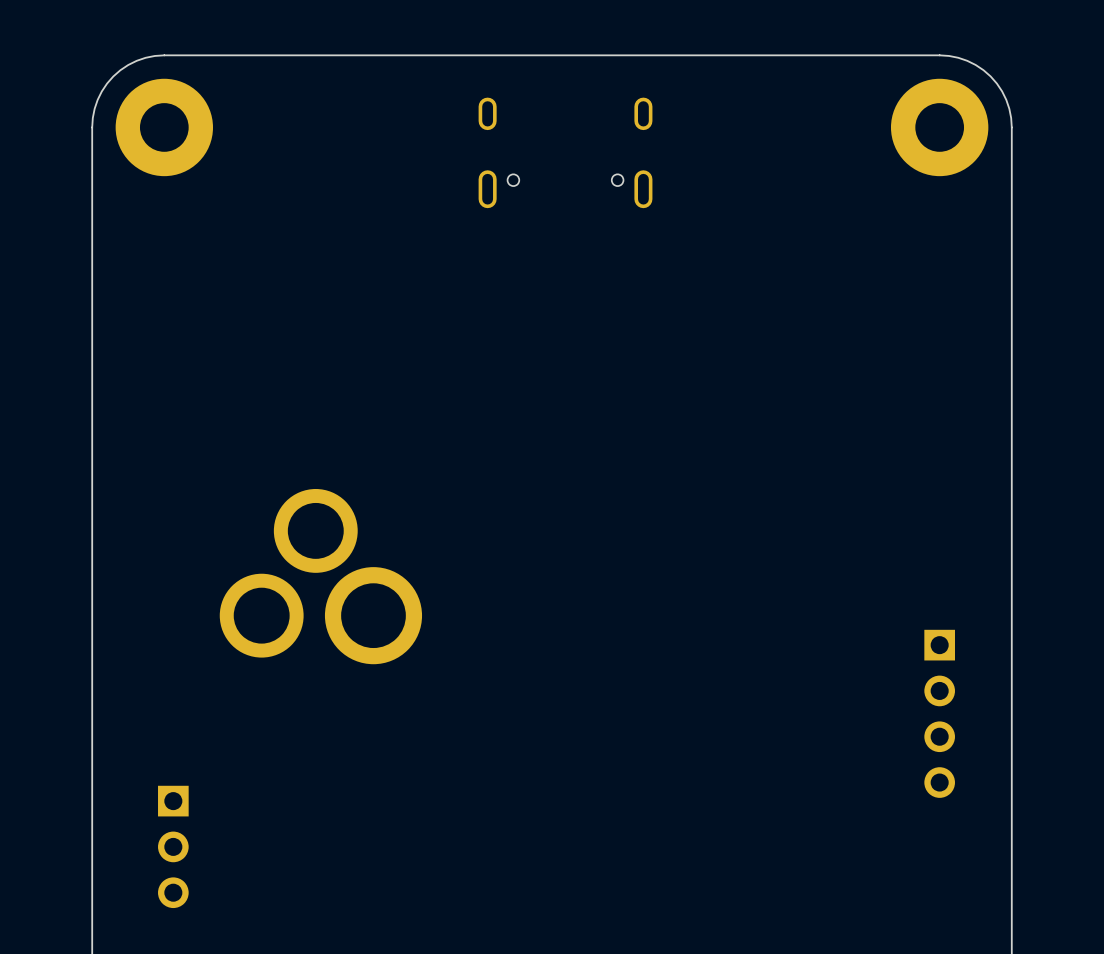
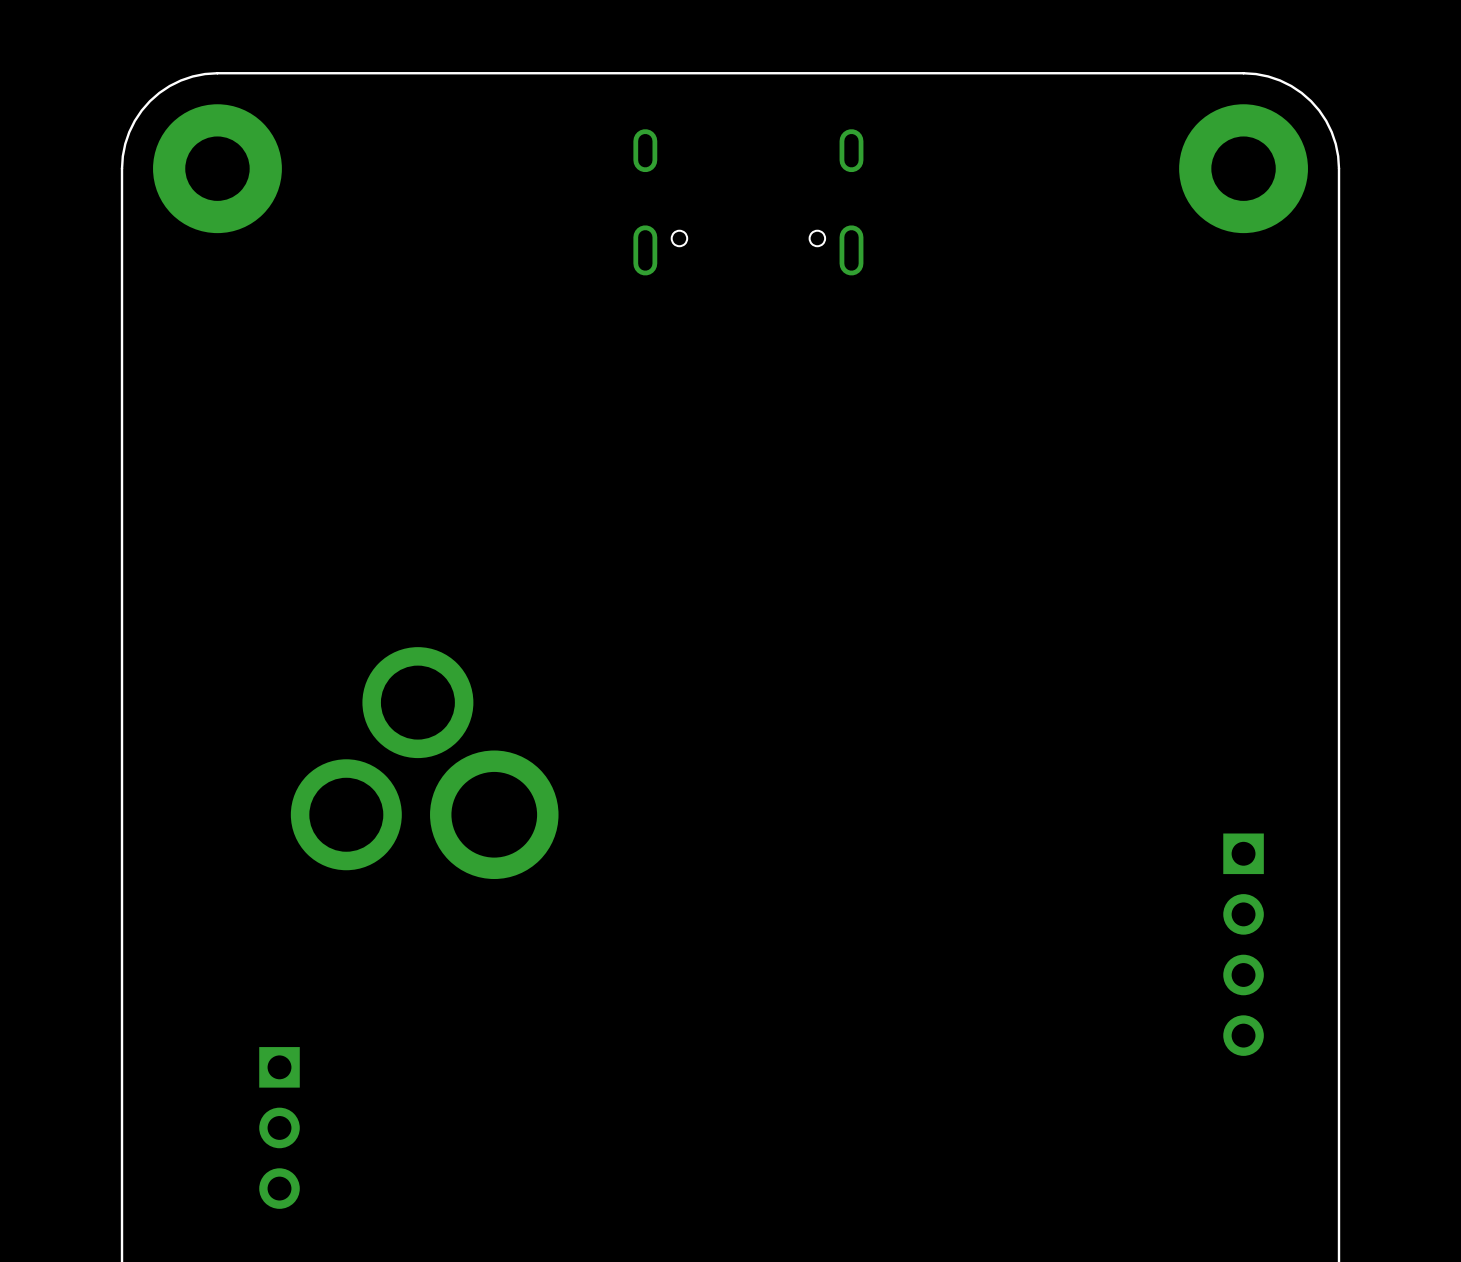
part position: (173, 846) -> (279, 1127)

